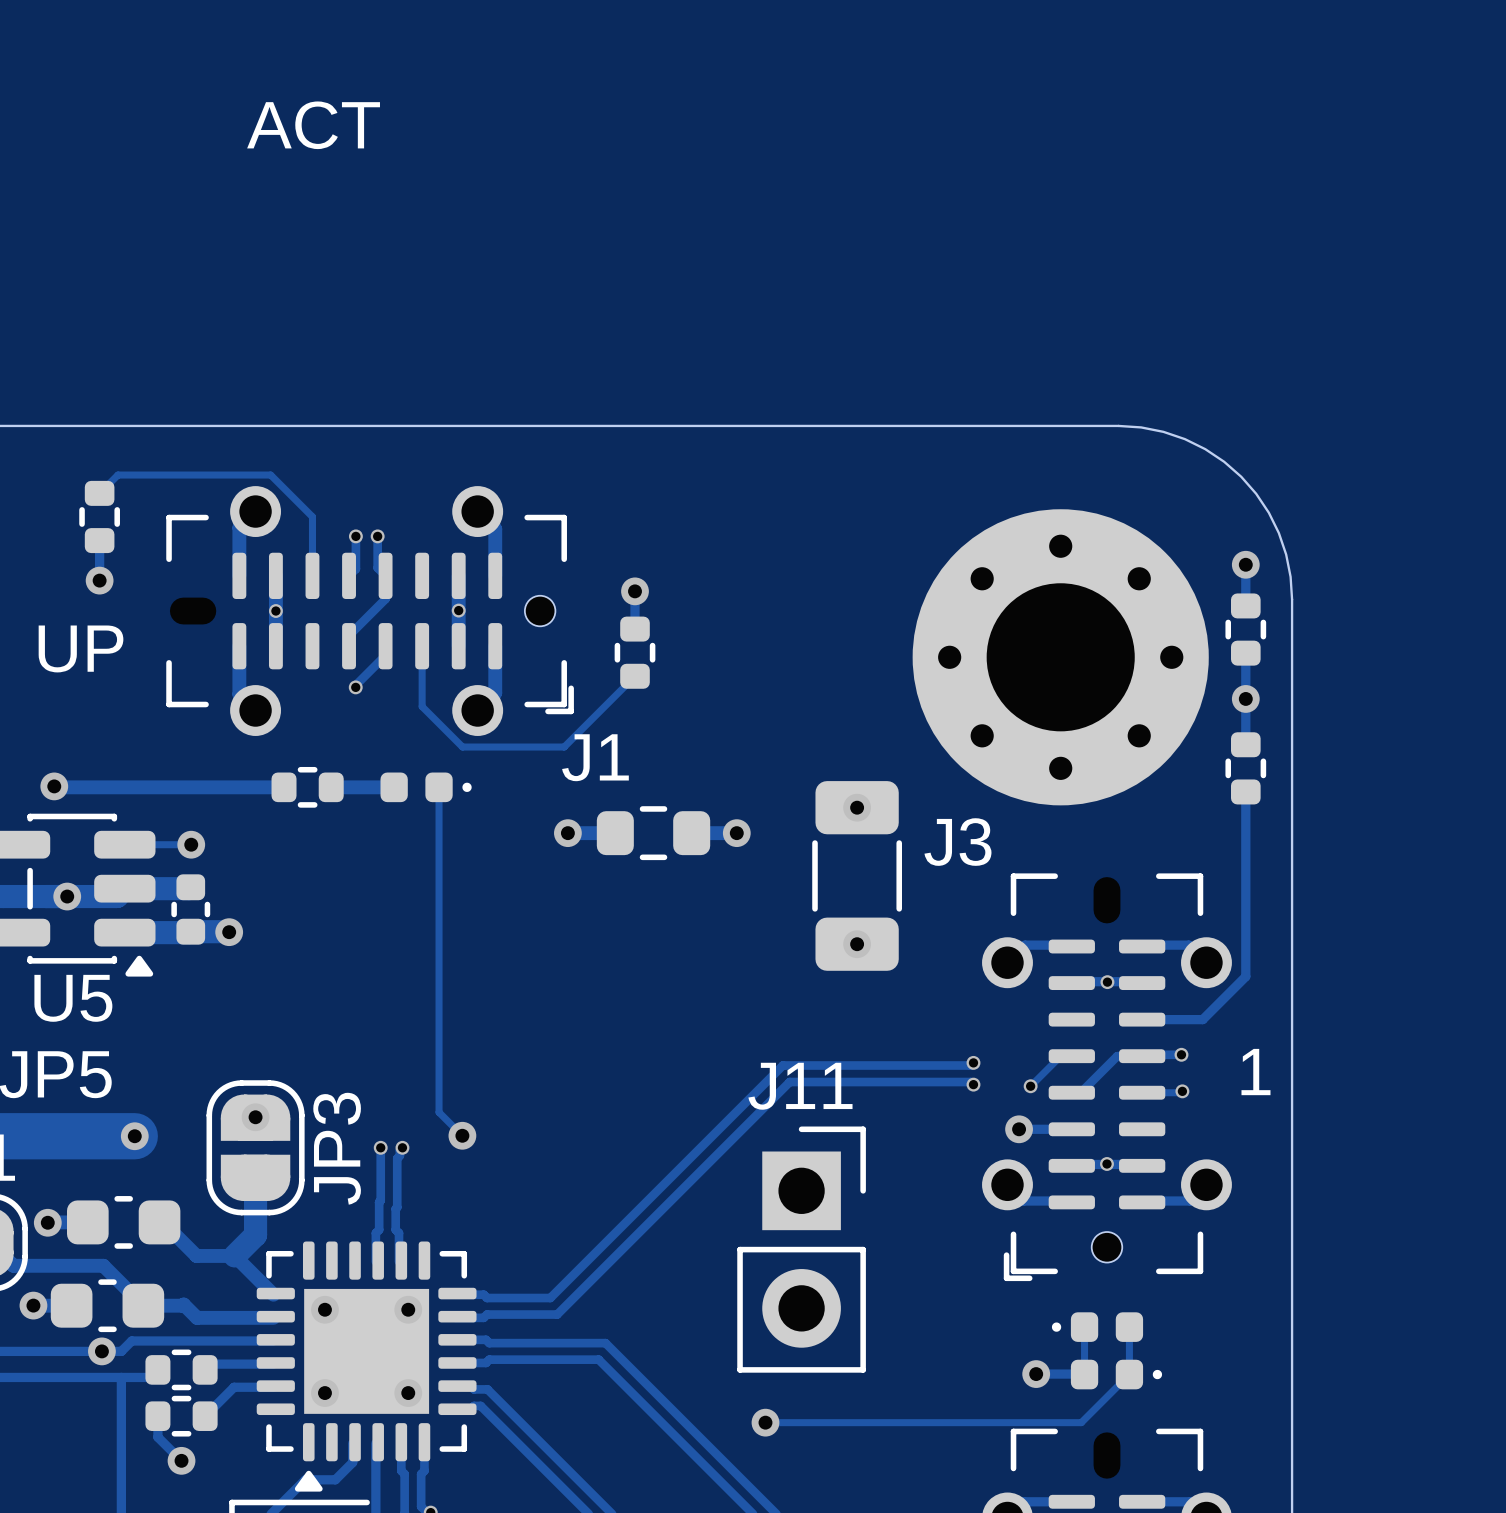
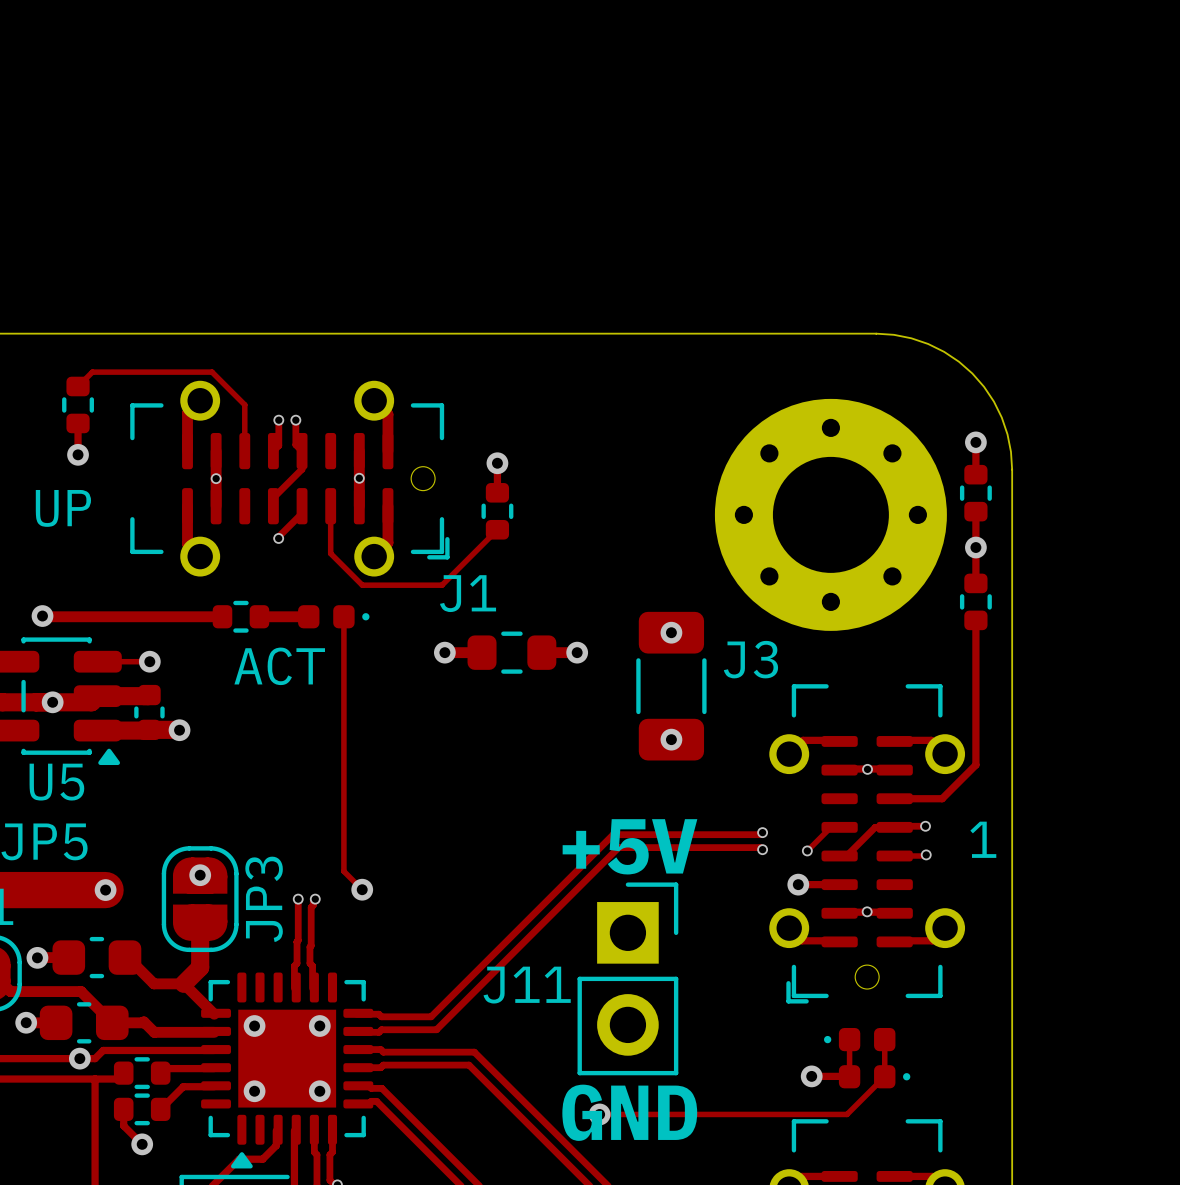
text position: ACT (313, 125) -> ACT (279, 666)
text: none -> +5V (629, 846)
J11 name position: J11 (800, 1086) -> J11 (527, 985)
text: none -> GND (629, 1112)

